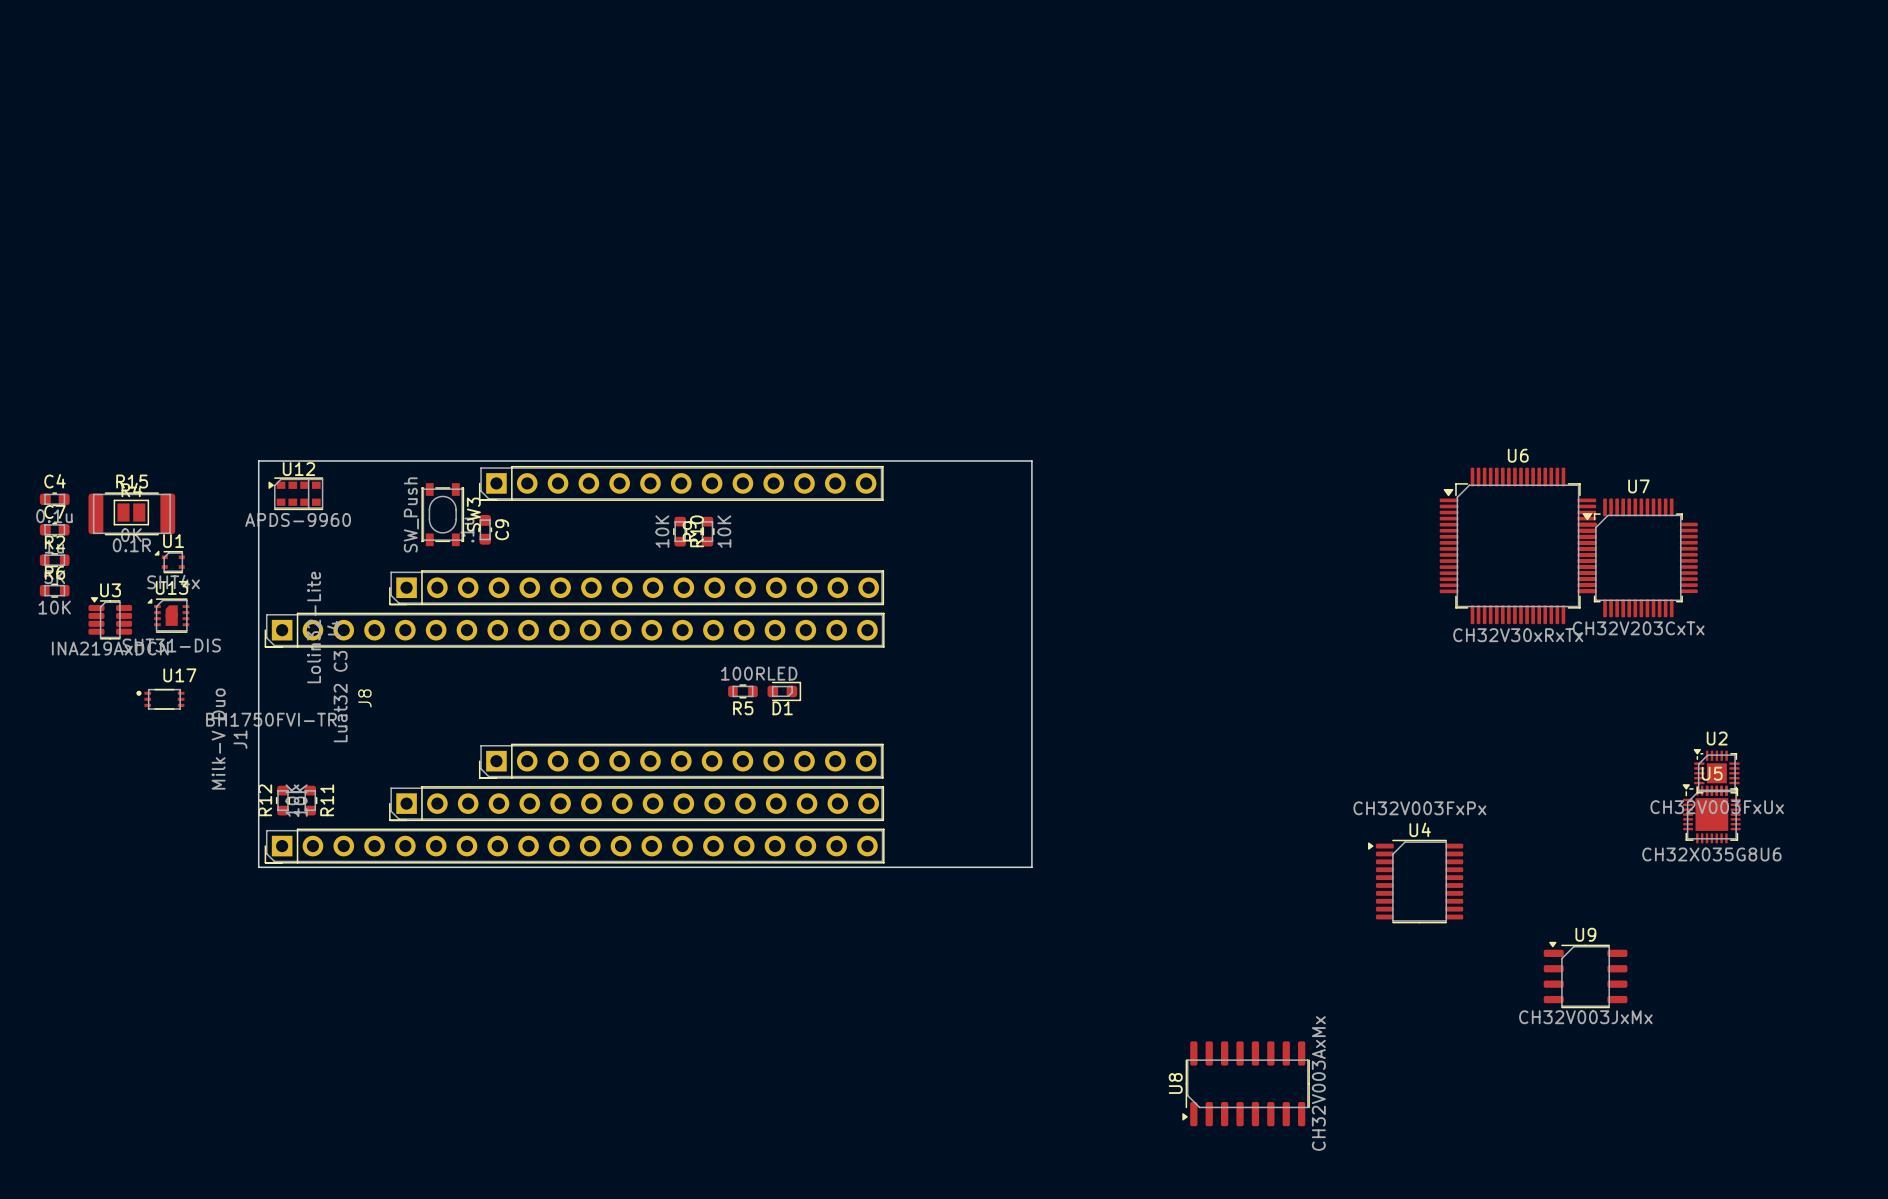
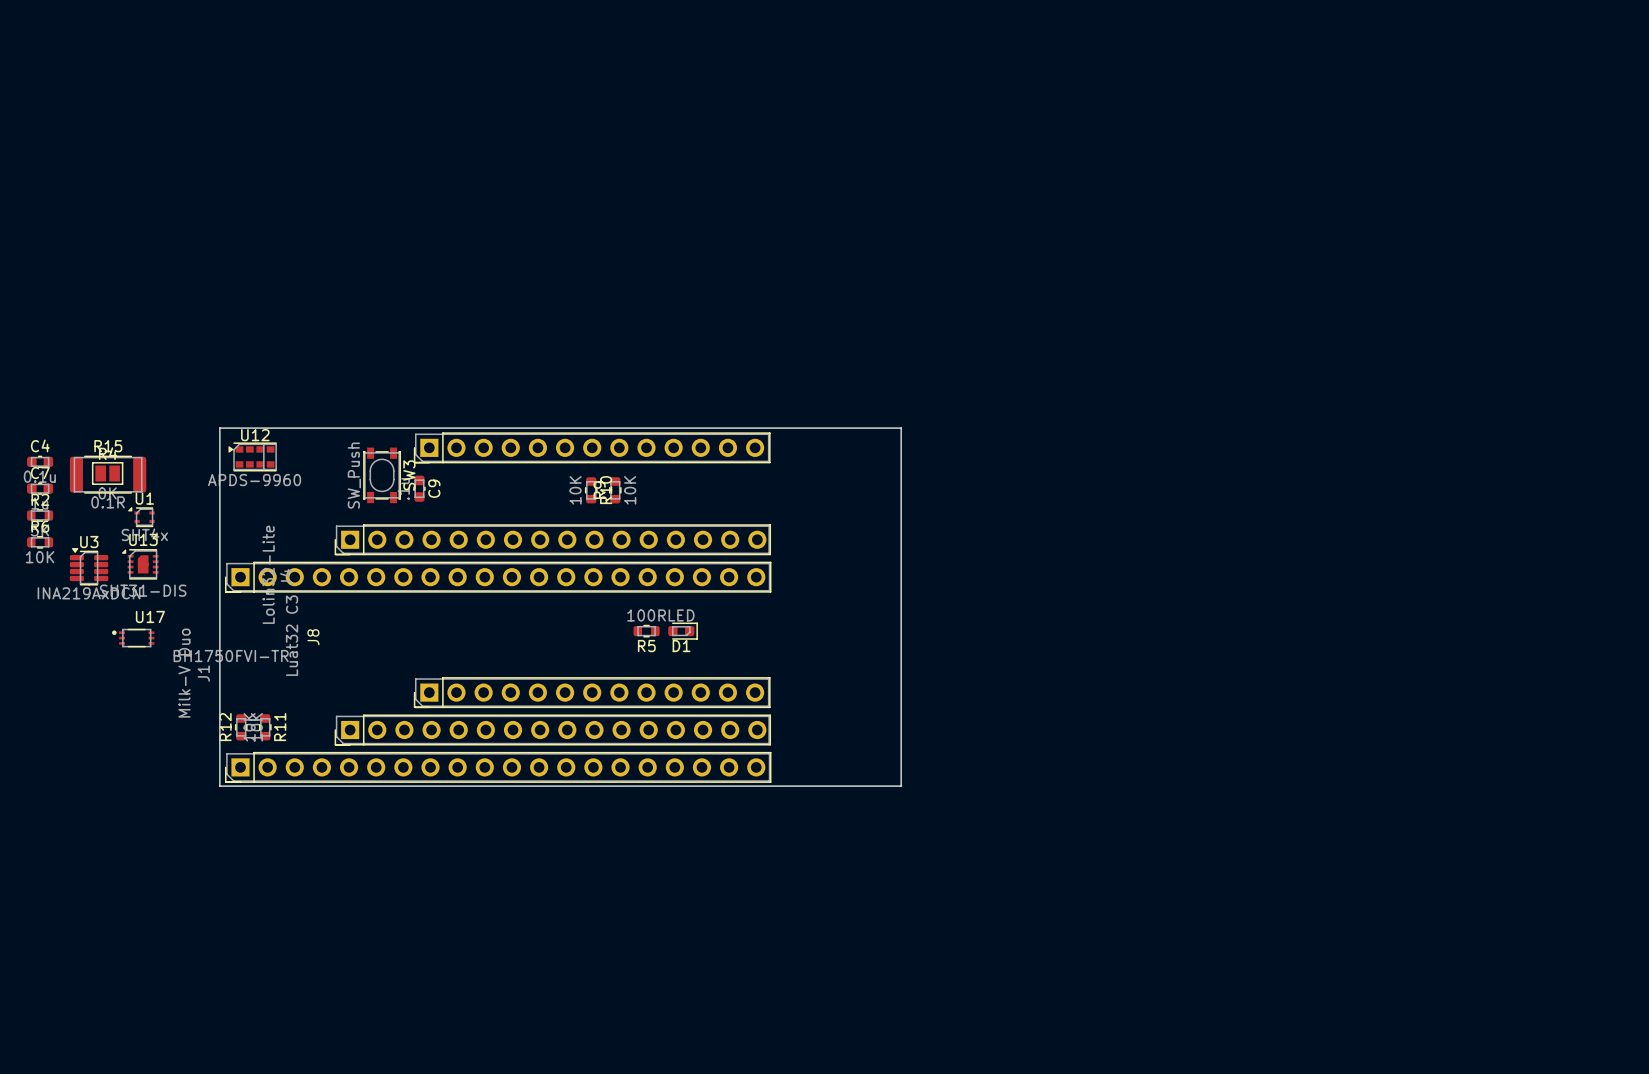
U6: CH32V30xRxTx (1517, 545) -> none
U7: CH32V203CxTx (1638, 557) -> none
U2: CH32V003FxUx (1716, 772) -> none
U5: CH32X035G8U6 (1711, 813) -> none
U4: CH32V003FxPx (1415, 881) -> none
U9: CH32V003JxMx (1585, 975) -> none
U8: CH32V003AxMx (1246, 1083) -> none

